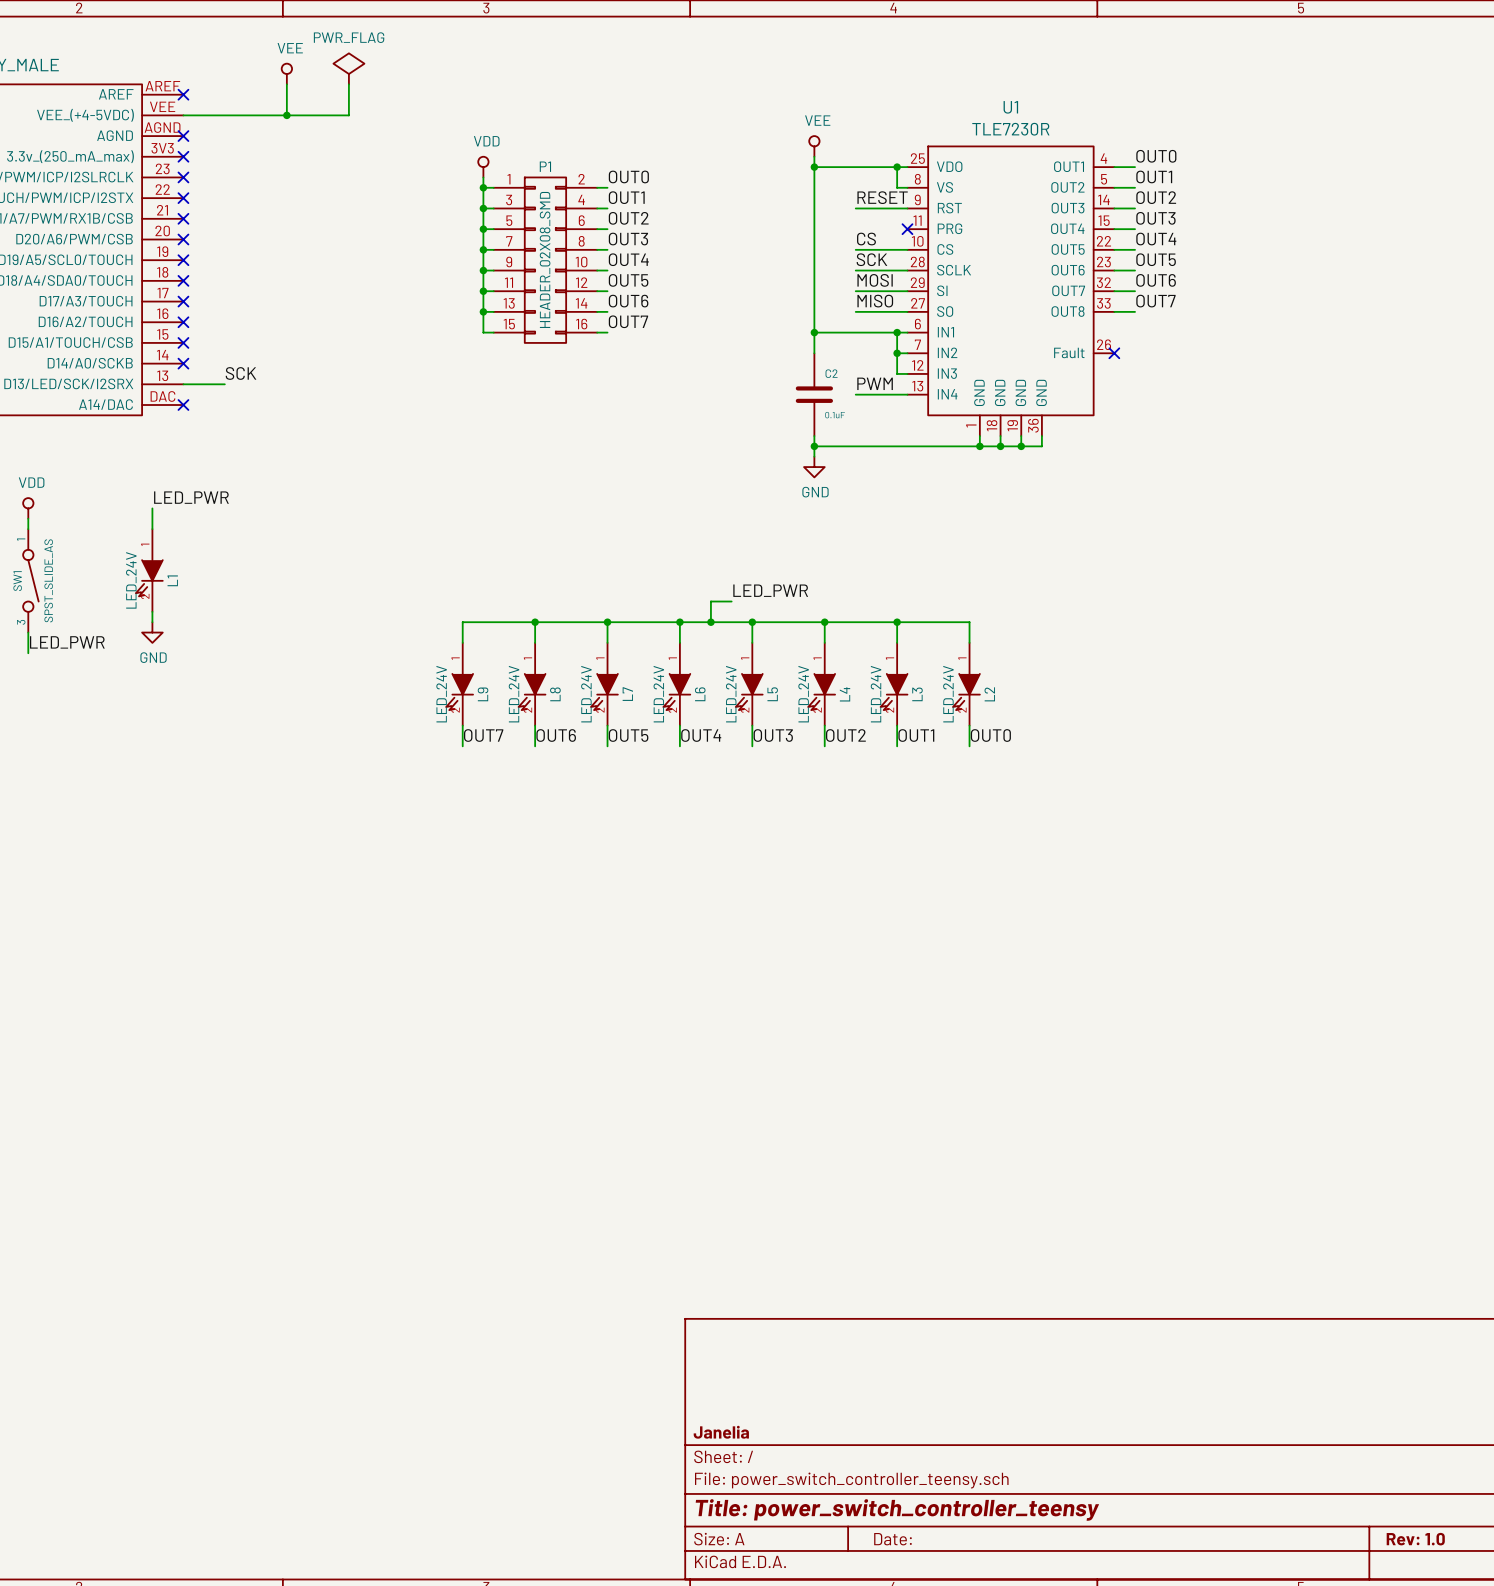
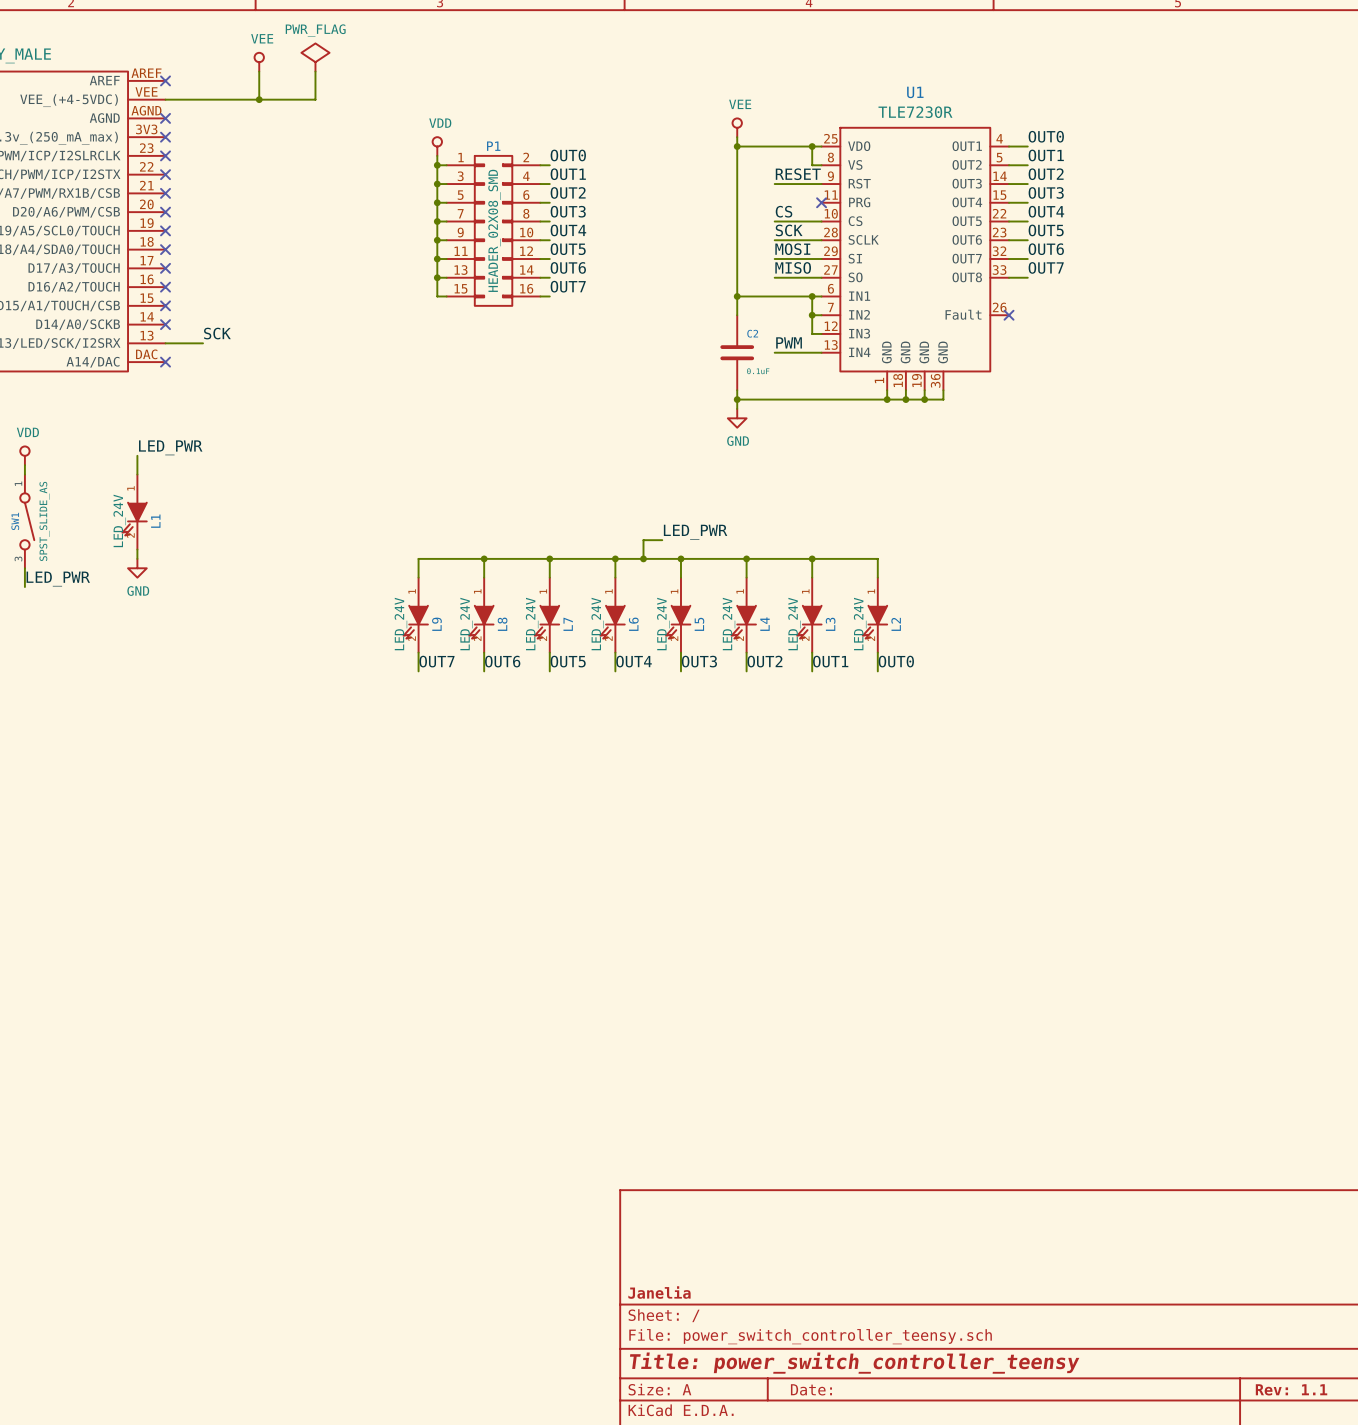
title block: Rev: 1.0 (1415, 1539) -> Rev: 1.1 (1291, 1389)

